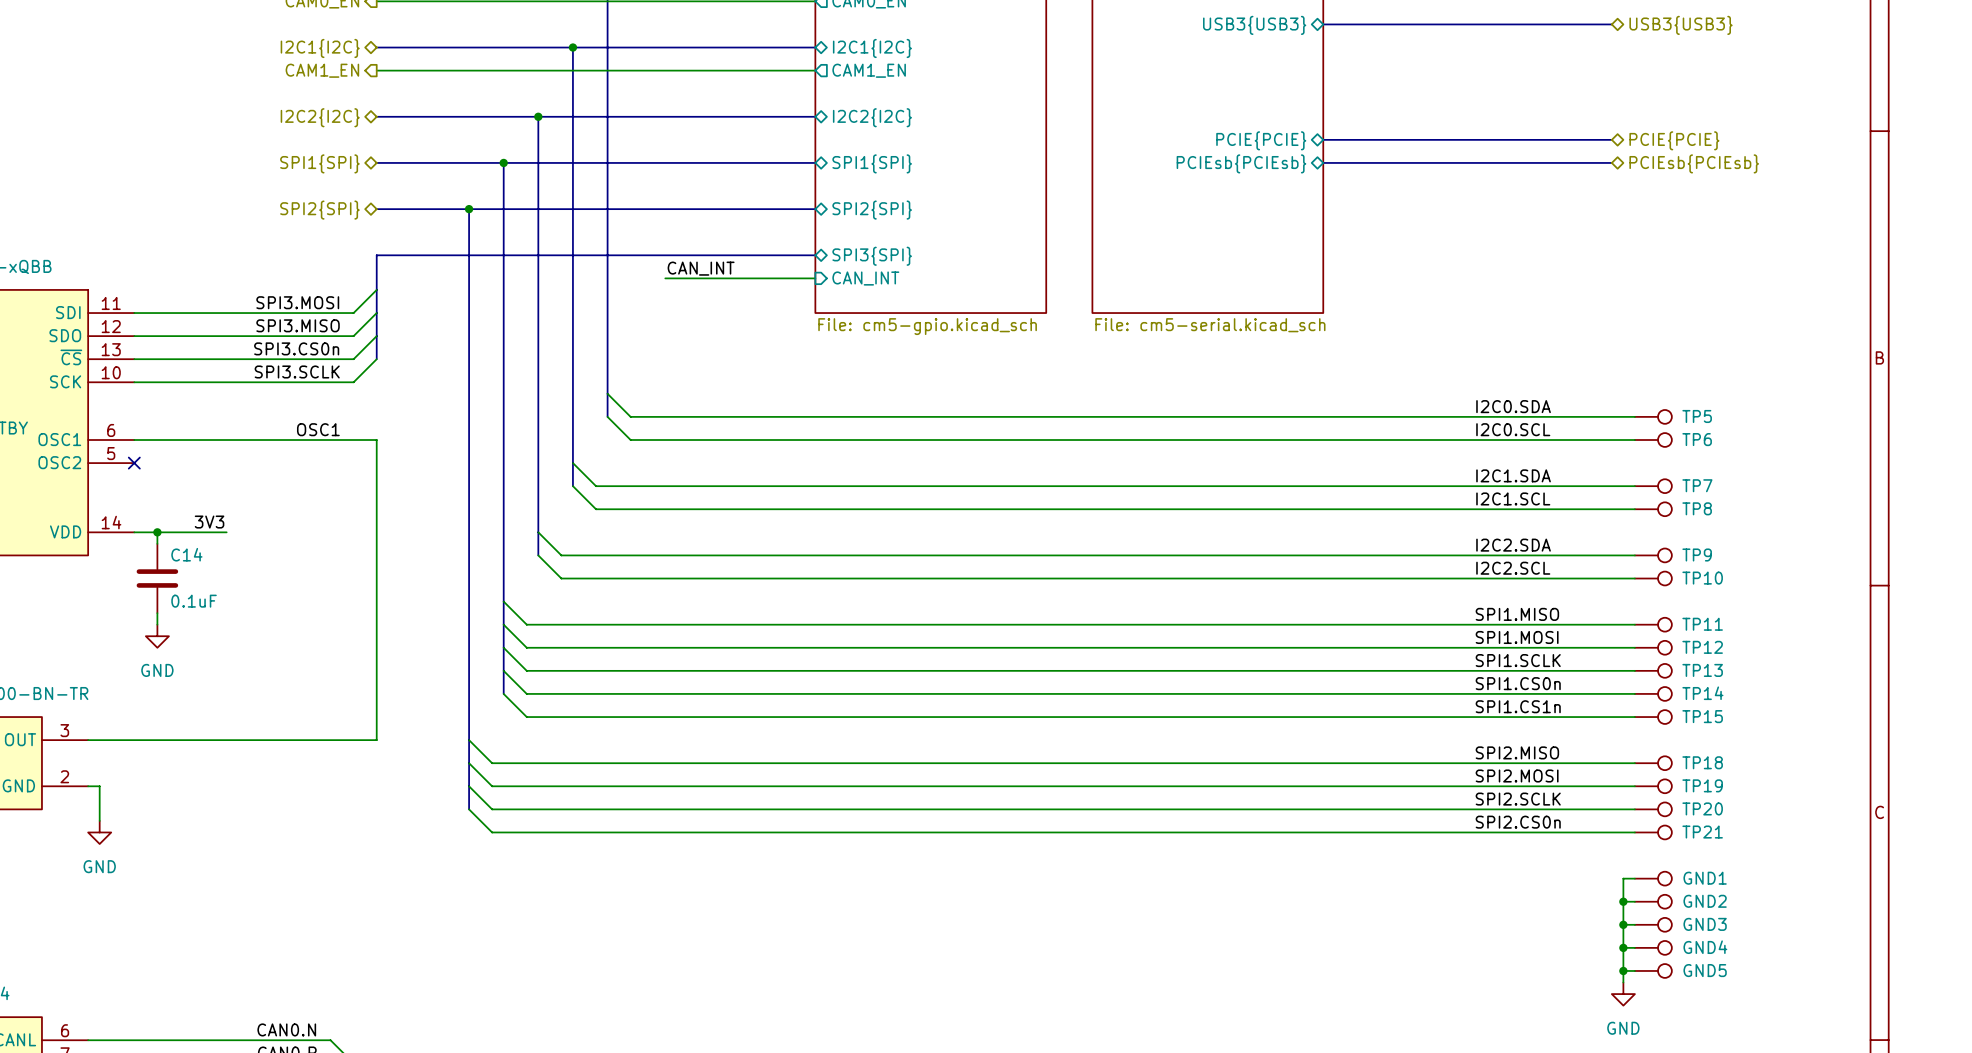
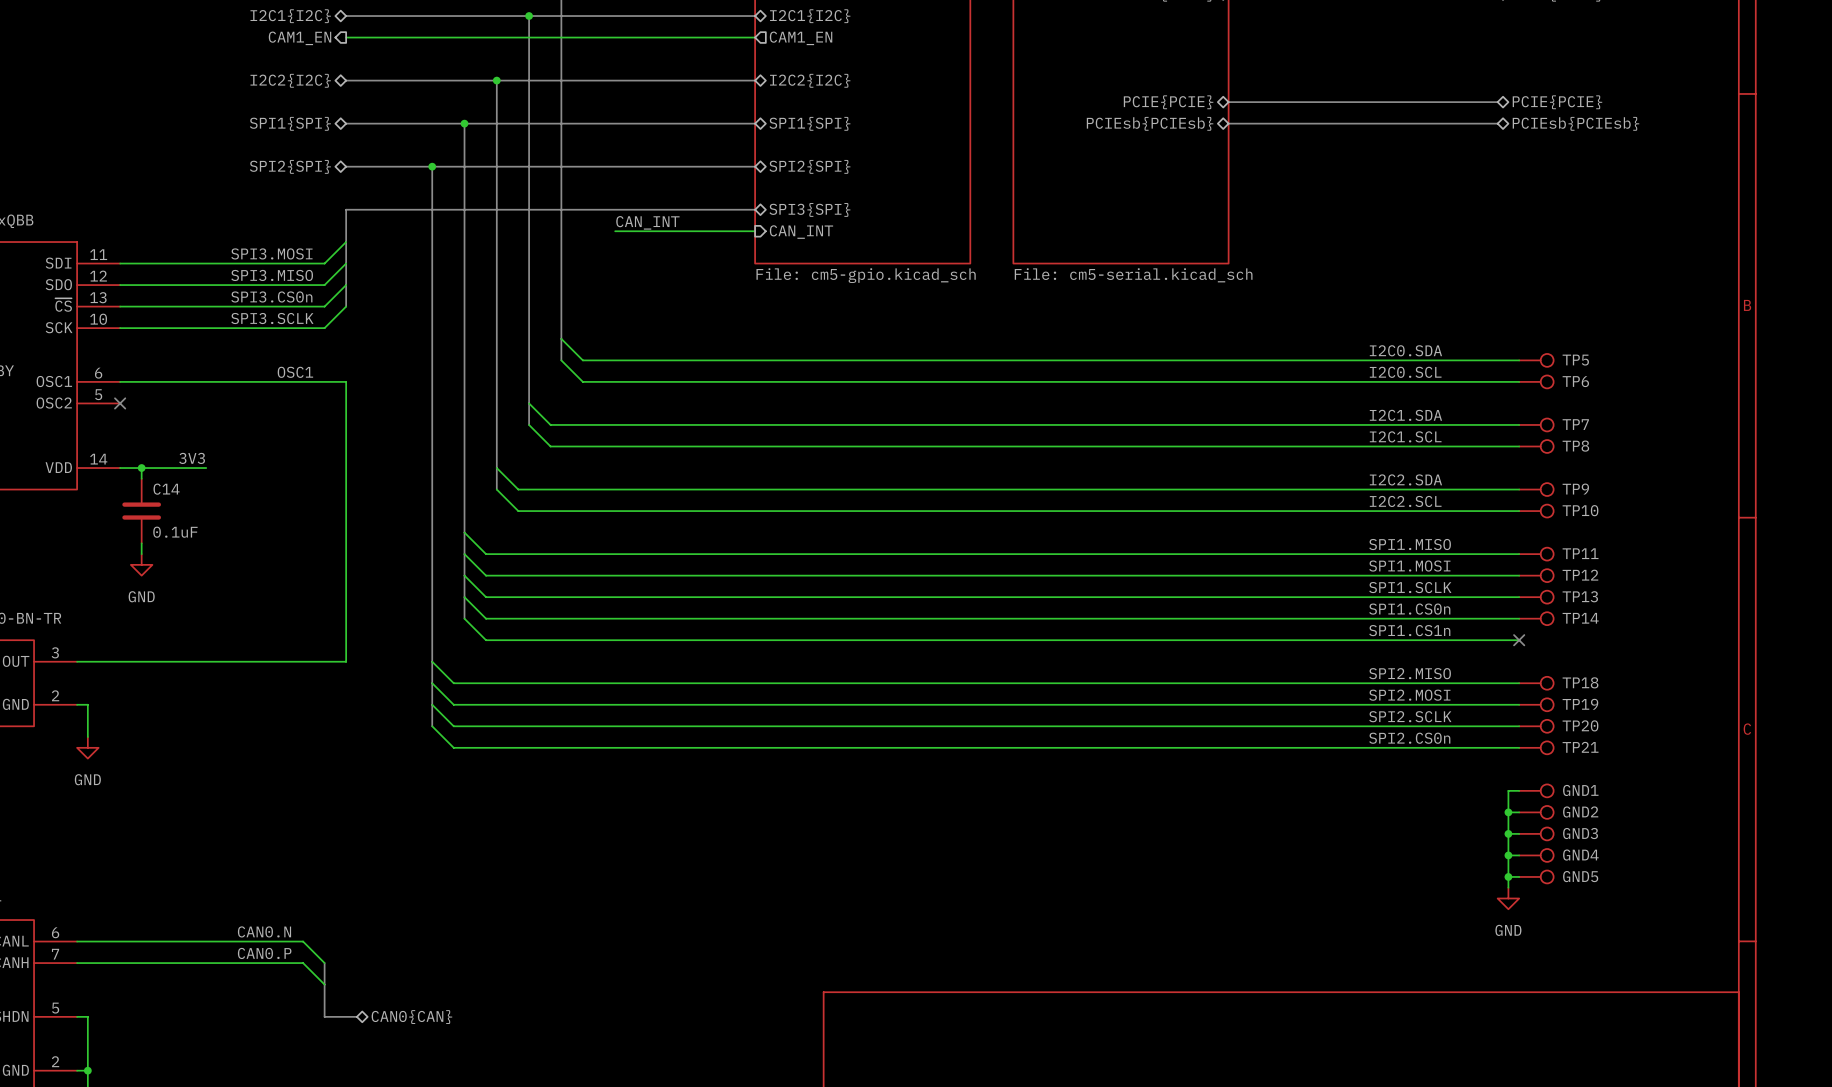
no-connect mark: none -> (1519, 640)
TP15: (1653, 717) -> none

